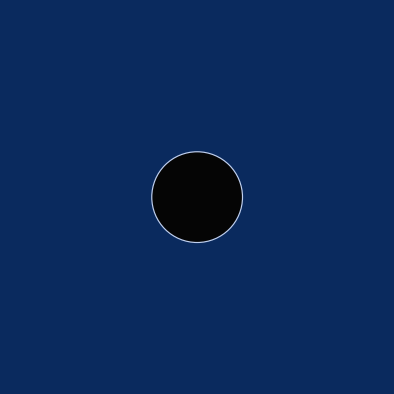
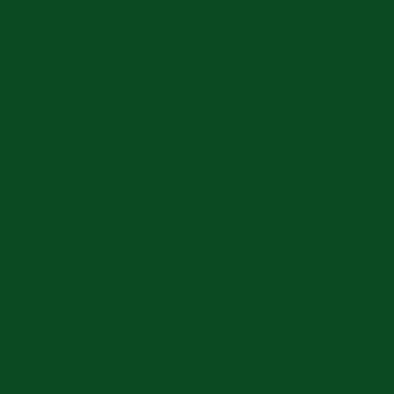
part: (197, 197) -> none

